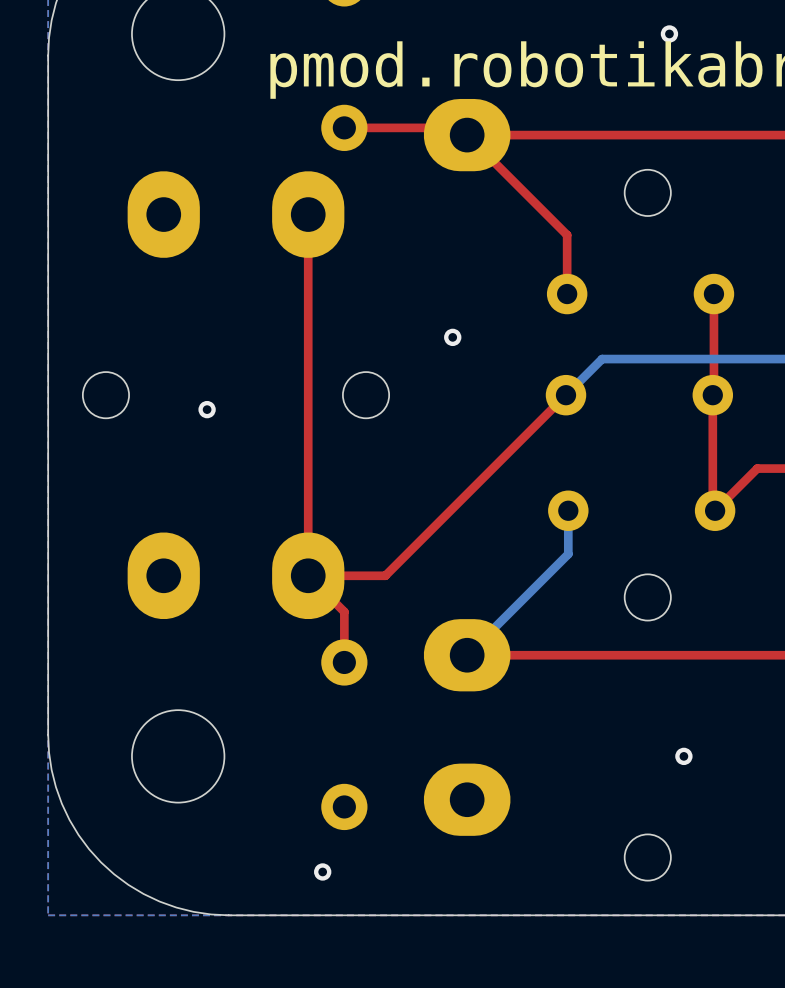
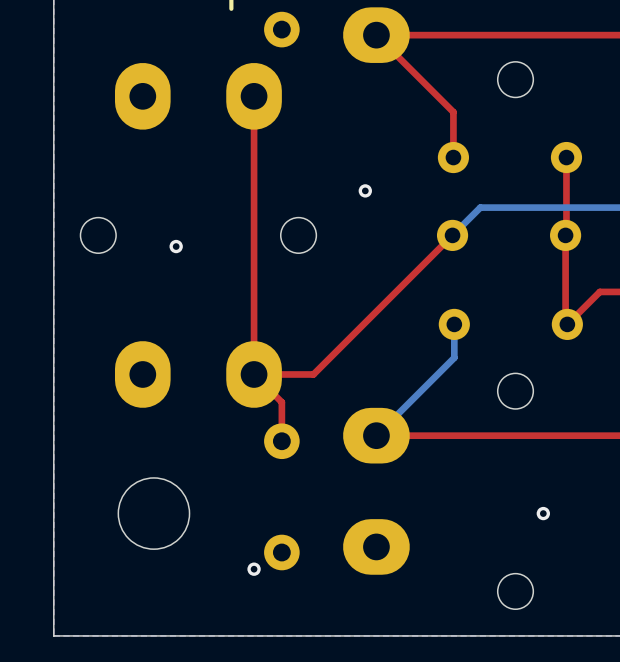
top track: (344, 127) (459, 127) (467, 135) -> none
board edge: (48, 734) (51, 769) (61, 803) (78, 835) (101, 862) (128, 884) (159, 901) (193, 911) (228, 915) -> (53, 496) (53, 635) (192, 635)
via position: (322, 871) -> (254, 569)

